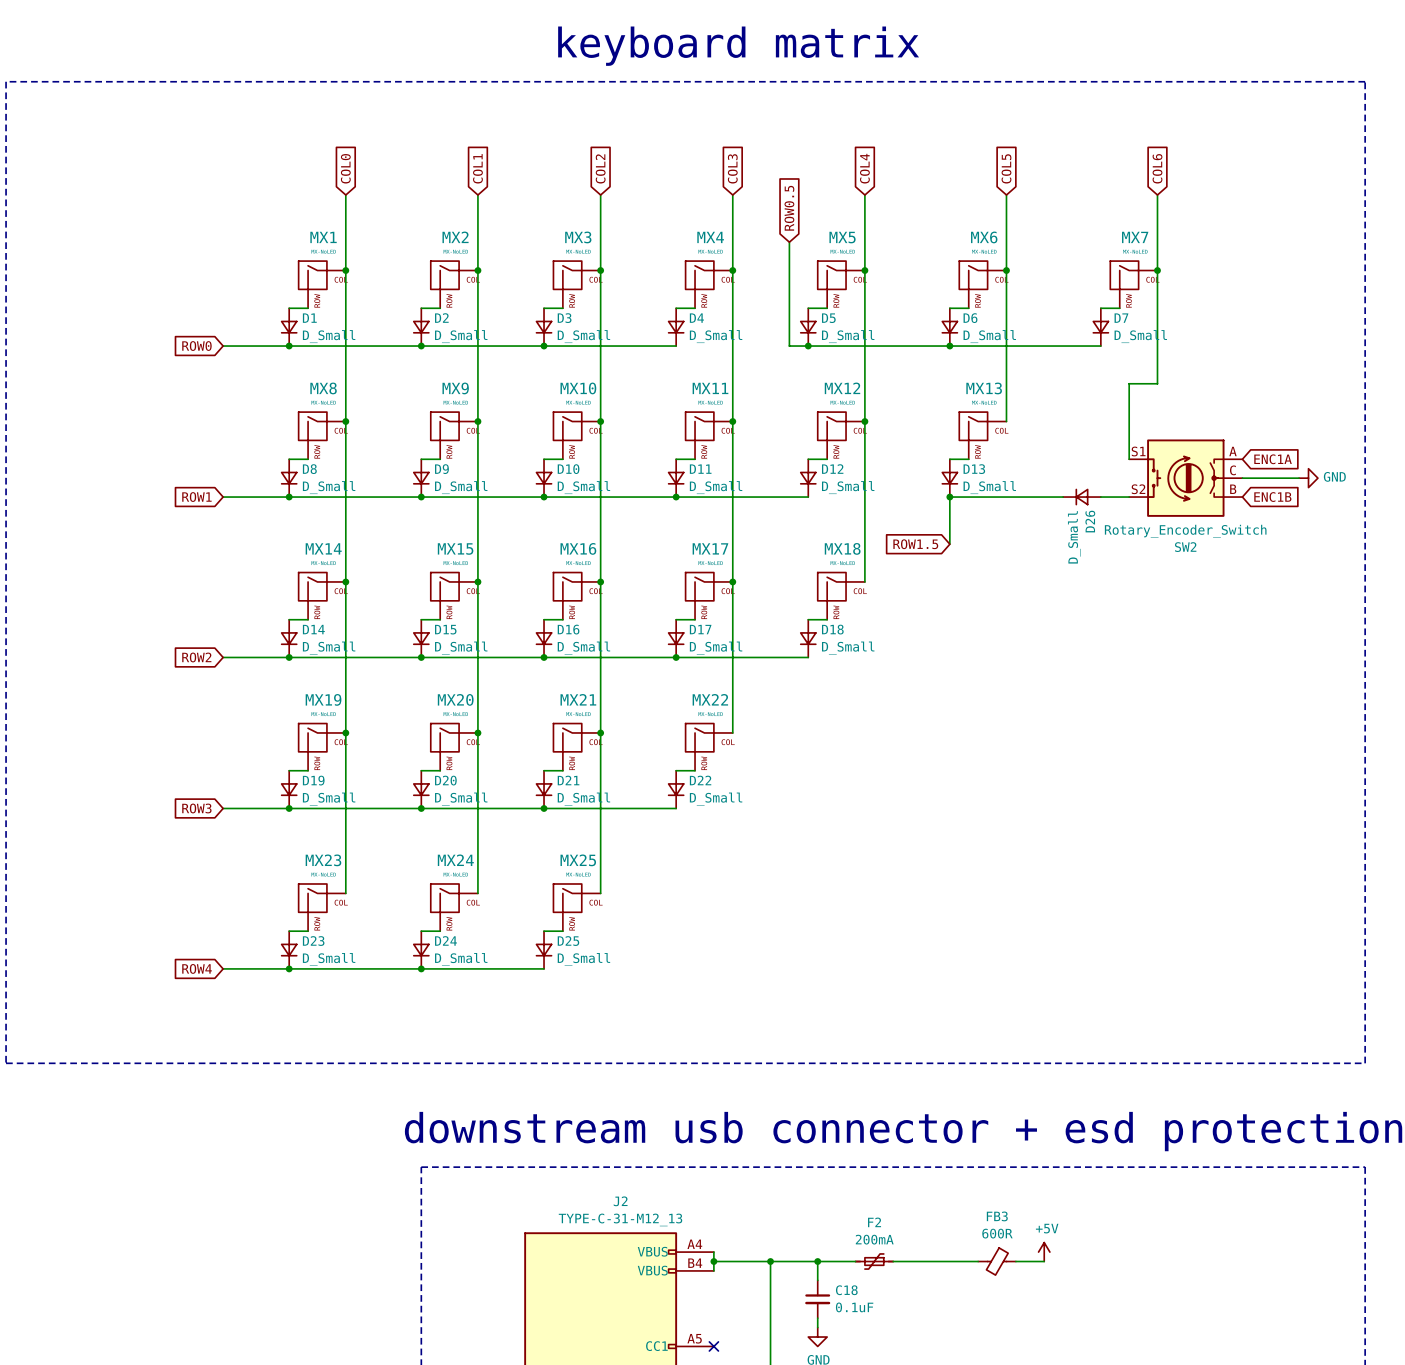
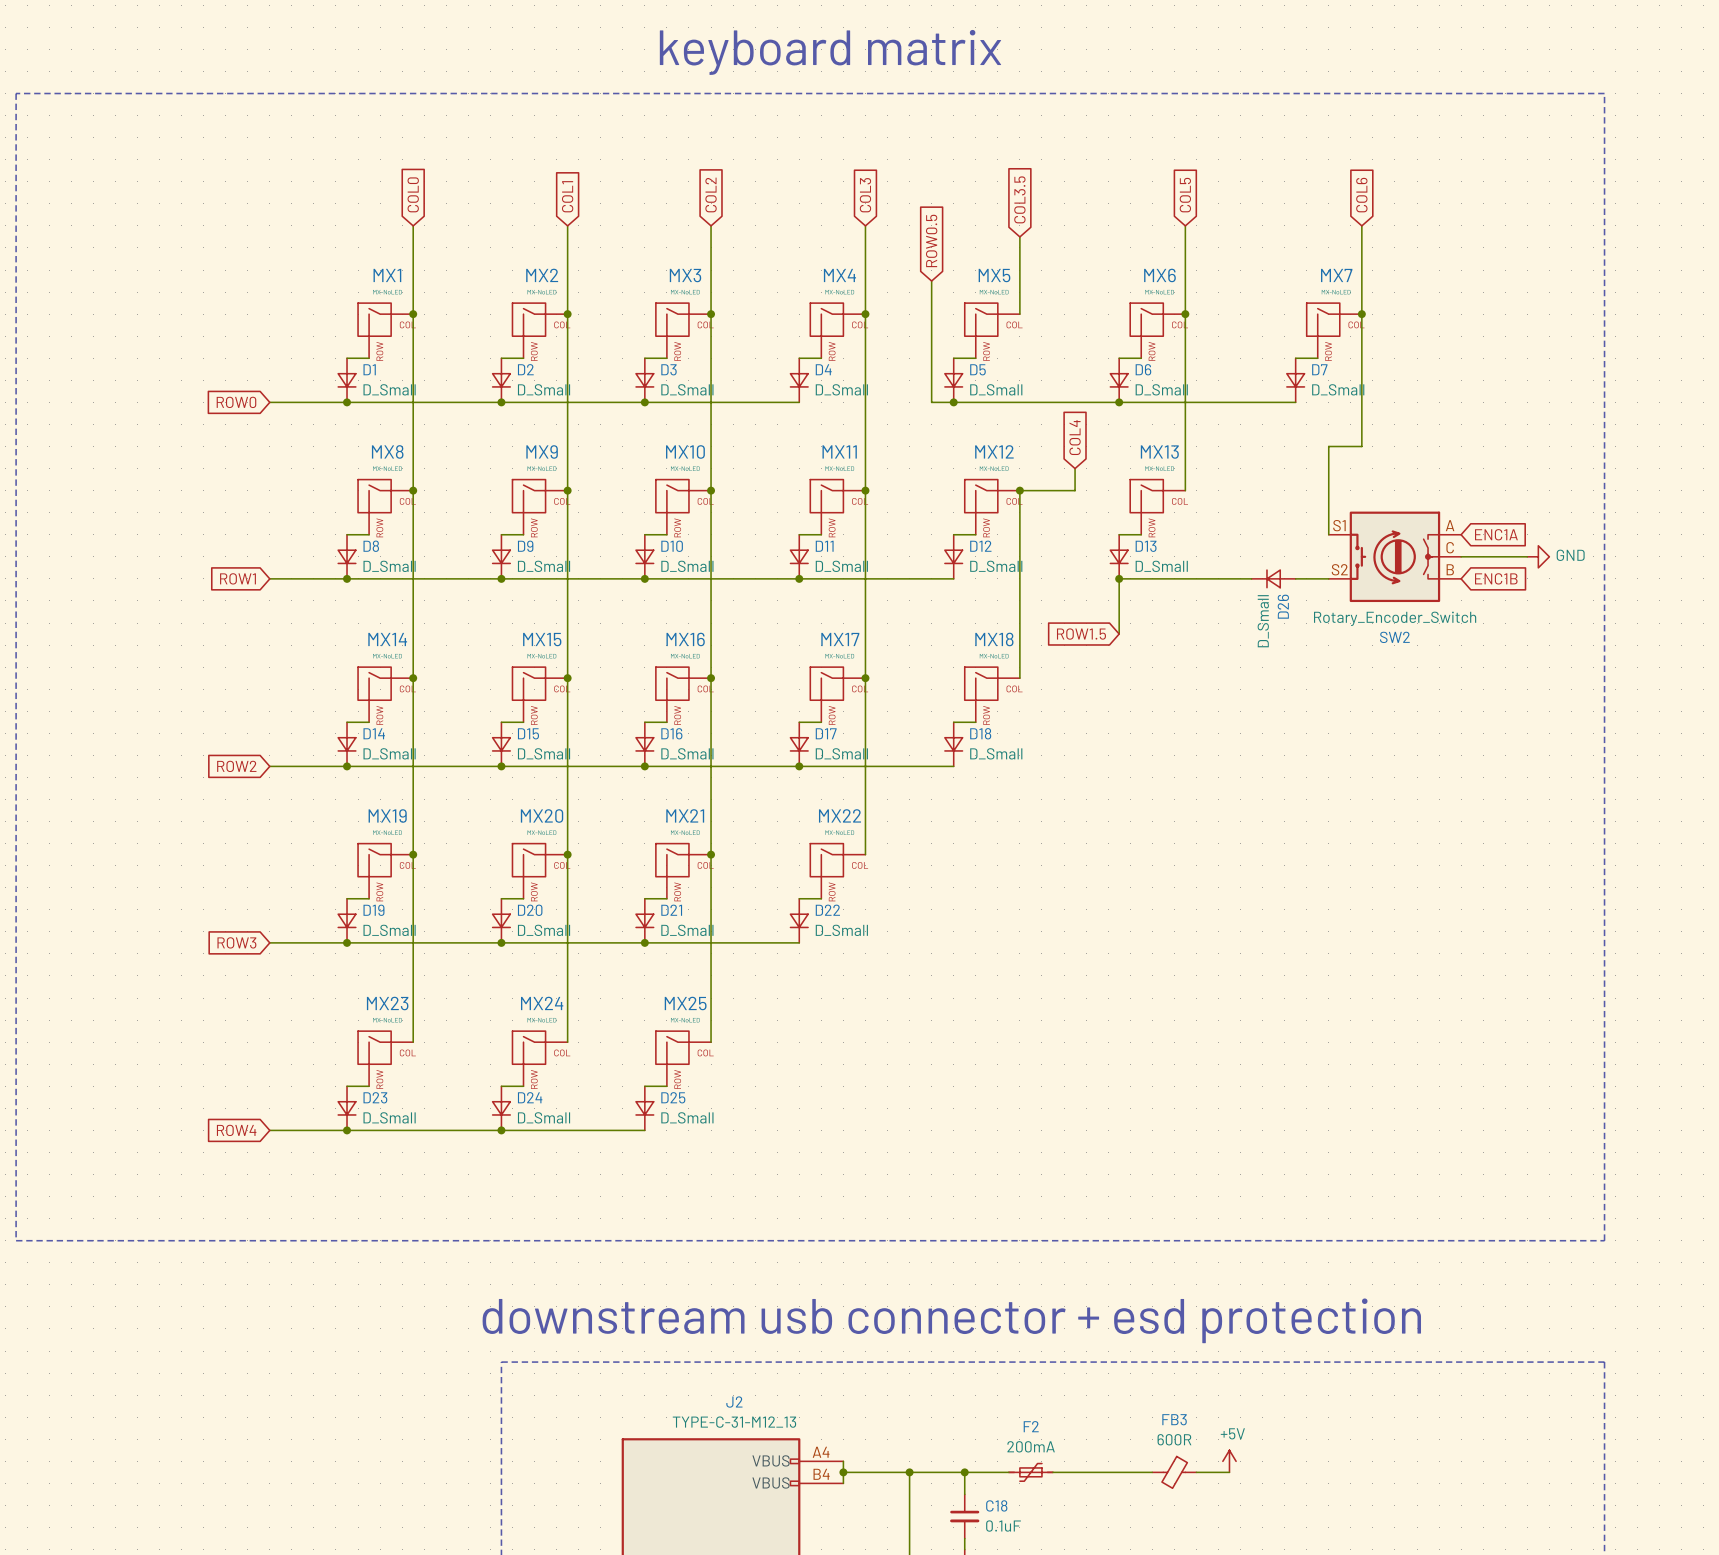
global label: COL4 (864, 168) -> none
global label: none -> COL3.5 (1019, 199)
wire: (864, 195) (864, 204) -> none
wire: (864, 270) (864, 421) -> (1075, 468) (1075, 490) (1019, 490)
junction: (864, 270) -> none
global label: none -> COL4 (1075, 437)

